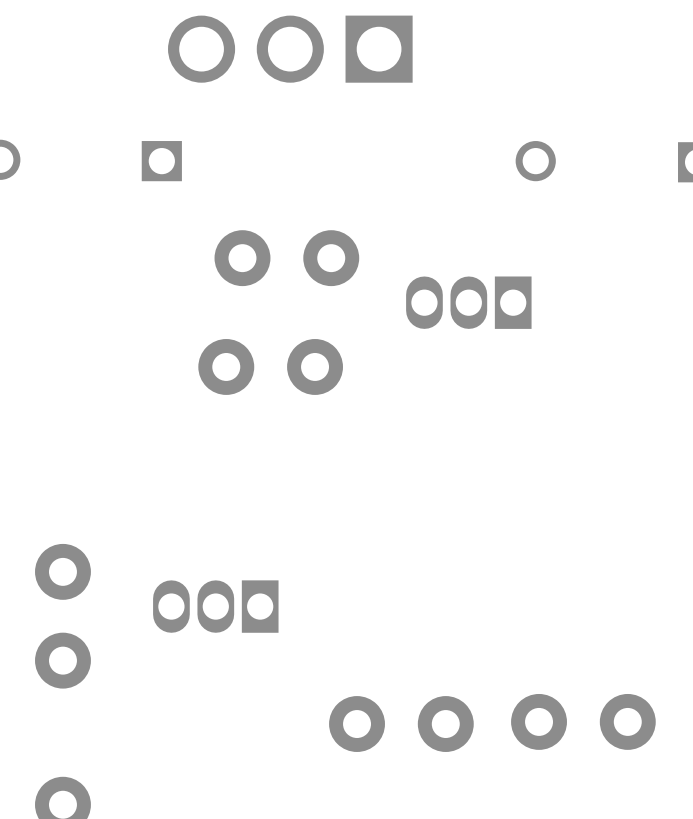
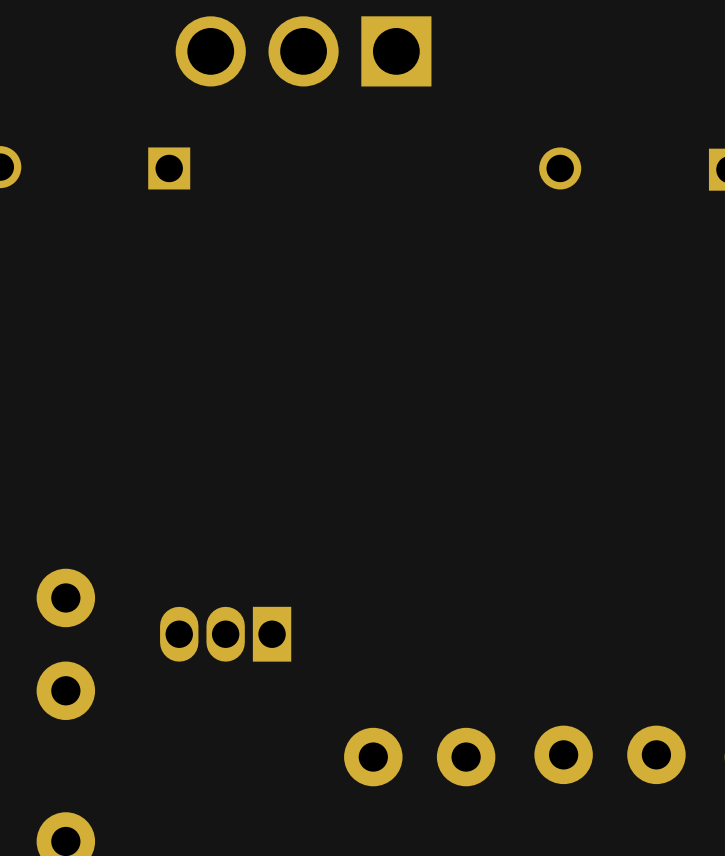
part: (286, 258) -> none
part: (468, 302) -> none
part: (270, 366) -> none

